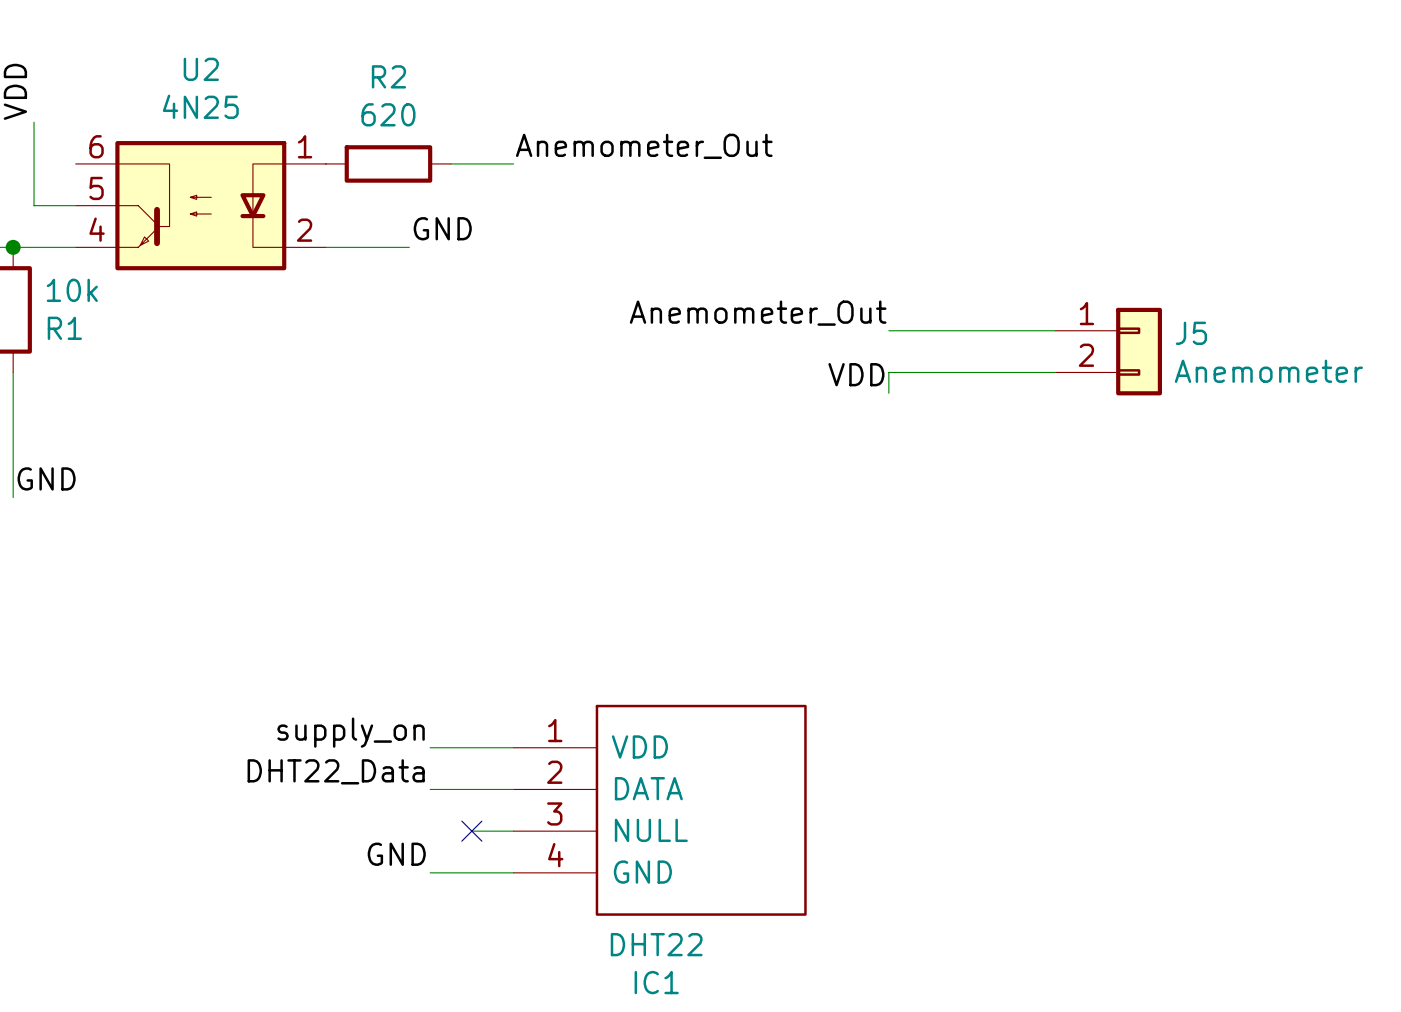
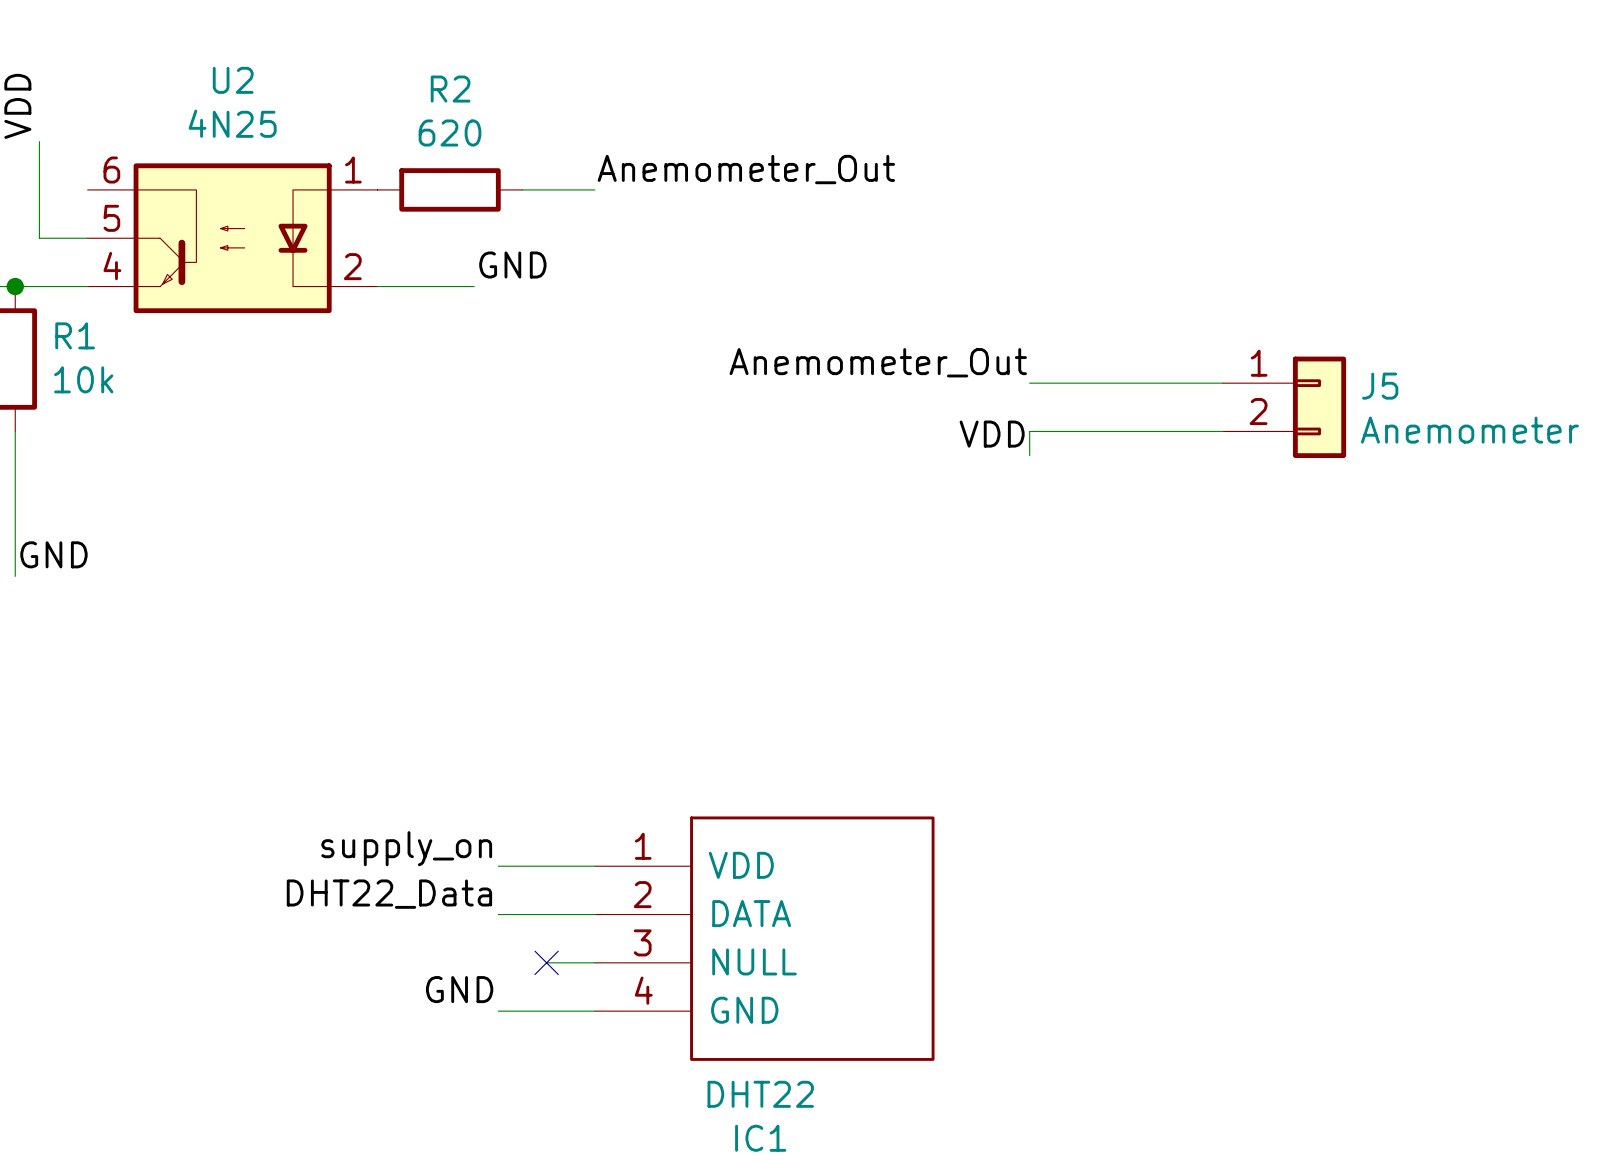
R1 value position: 10k (72, 290) -> 10k (83, 379)
R1 name position: R1 (64, 328) -> R1 (75, 335)

